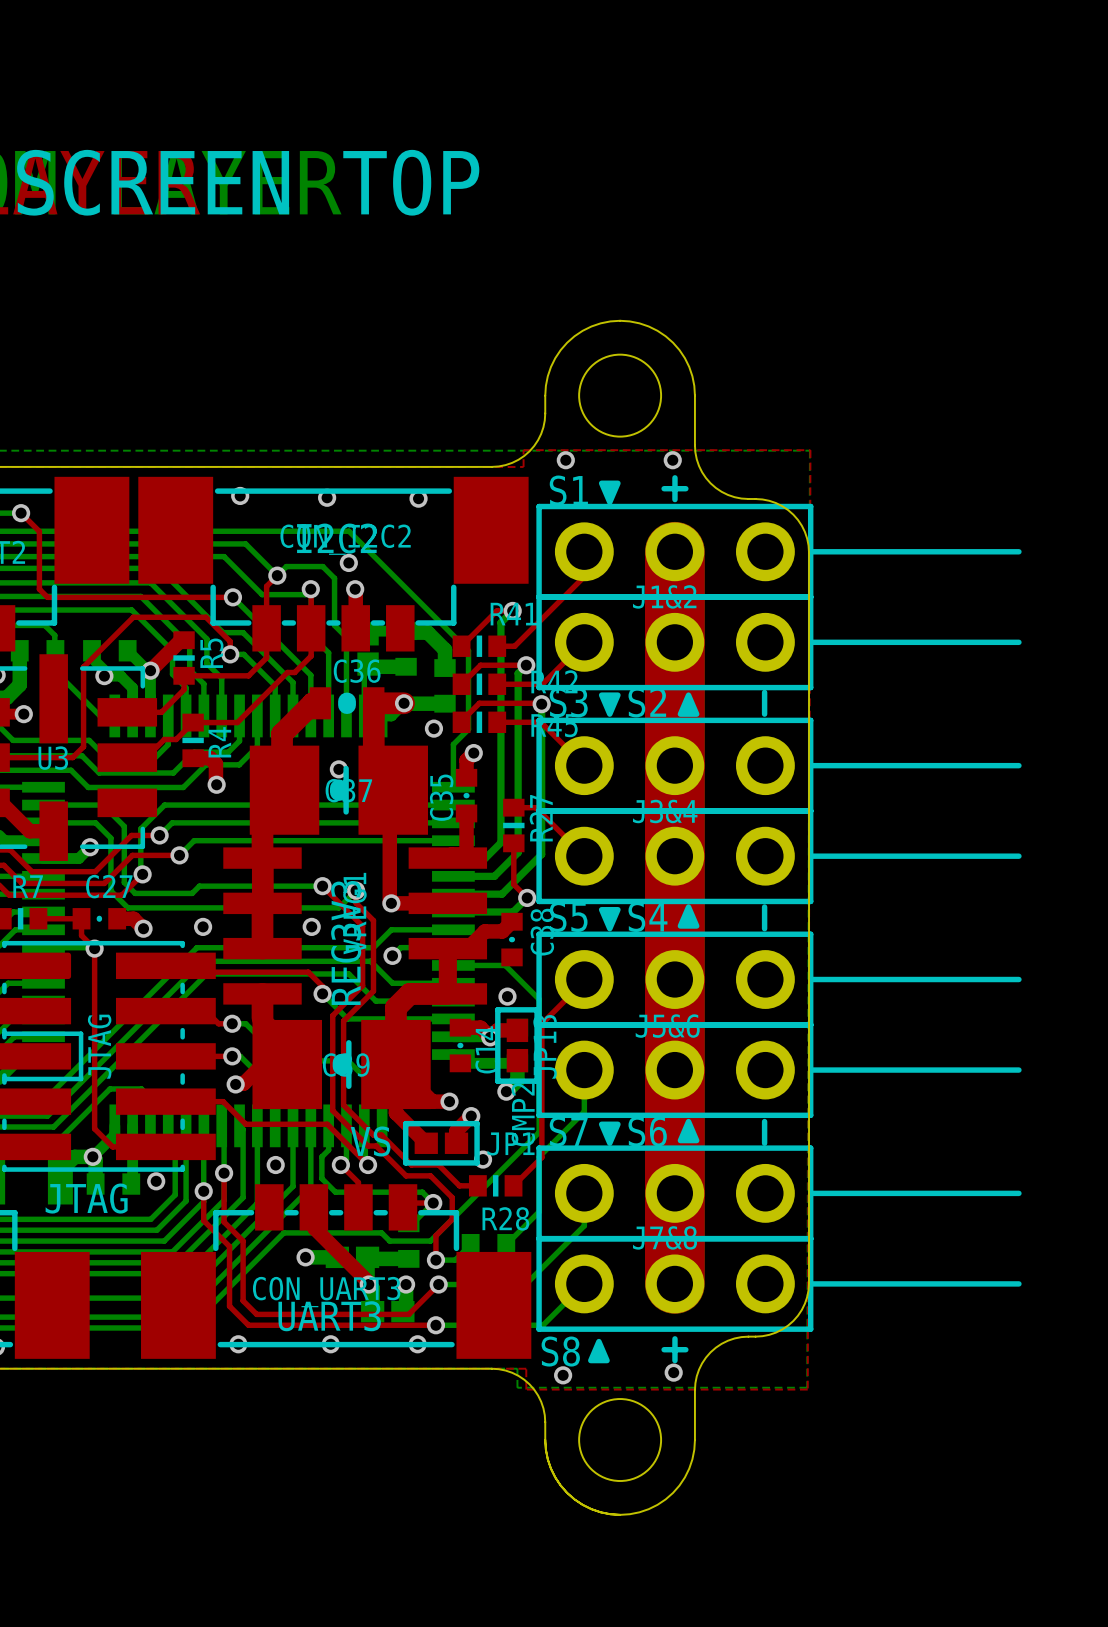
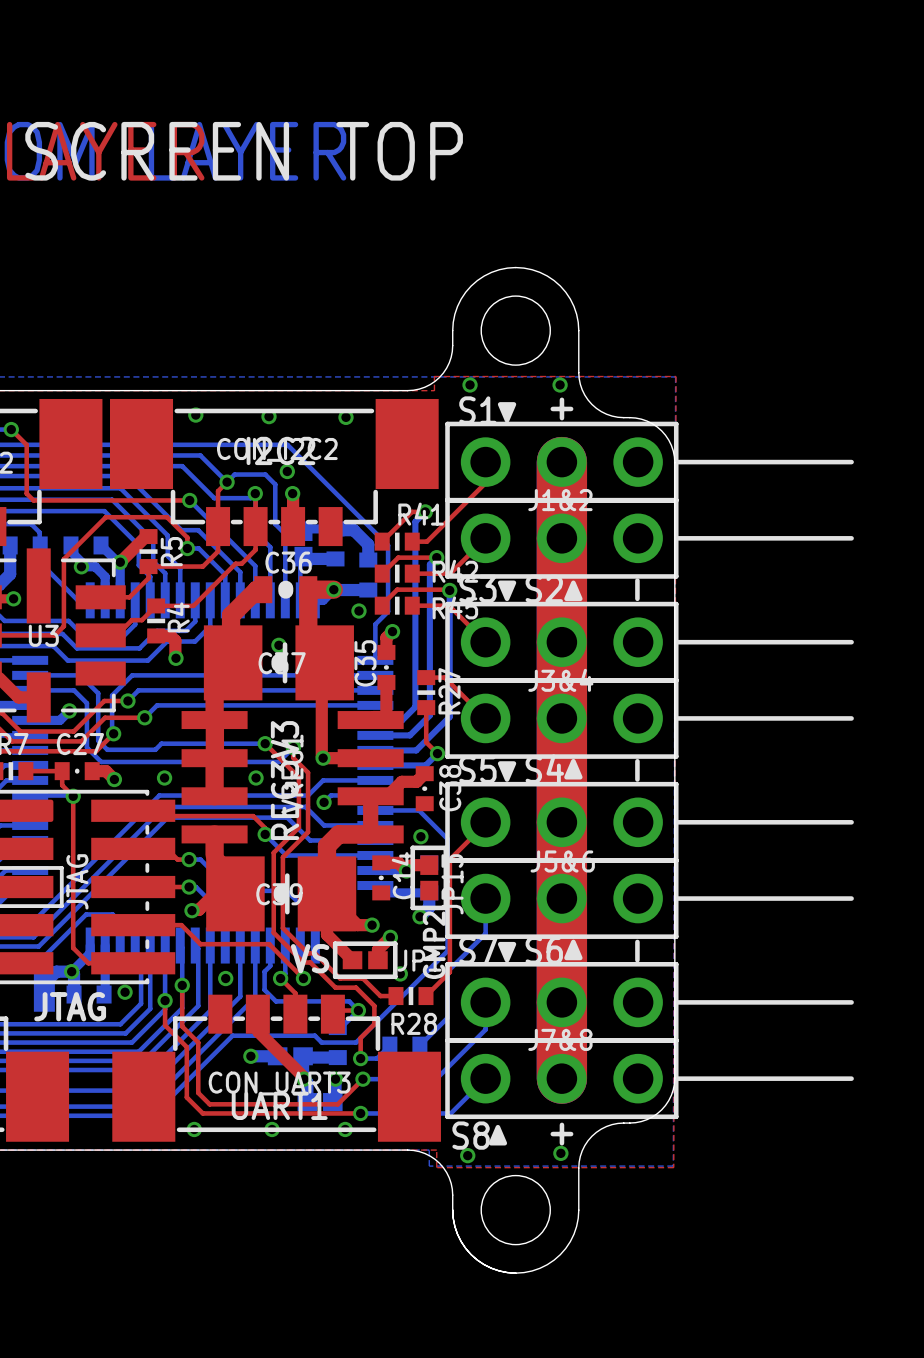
text: UART3 (329, 1316) -> UART1 (279, 1105)

